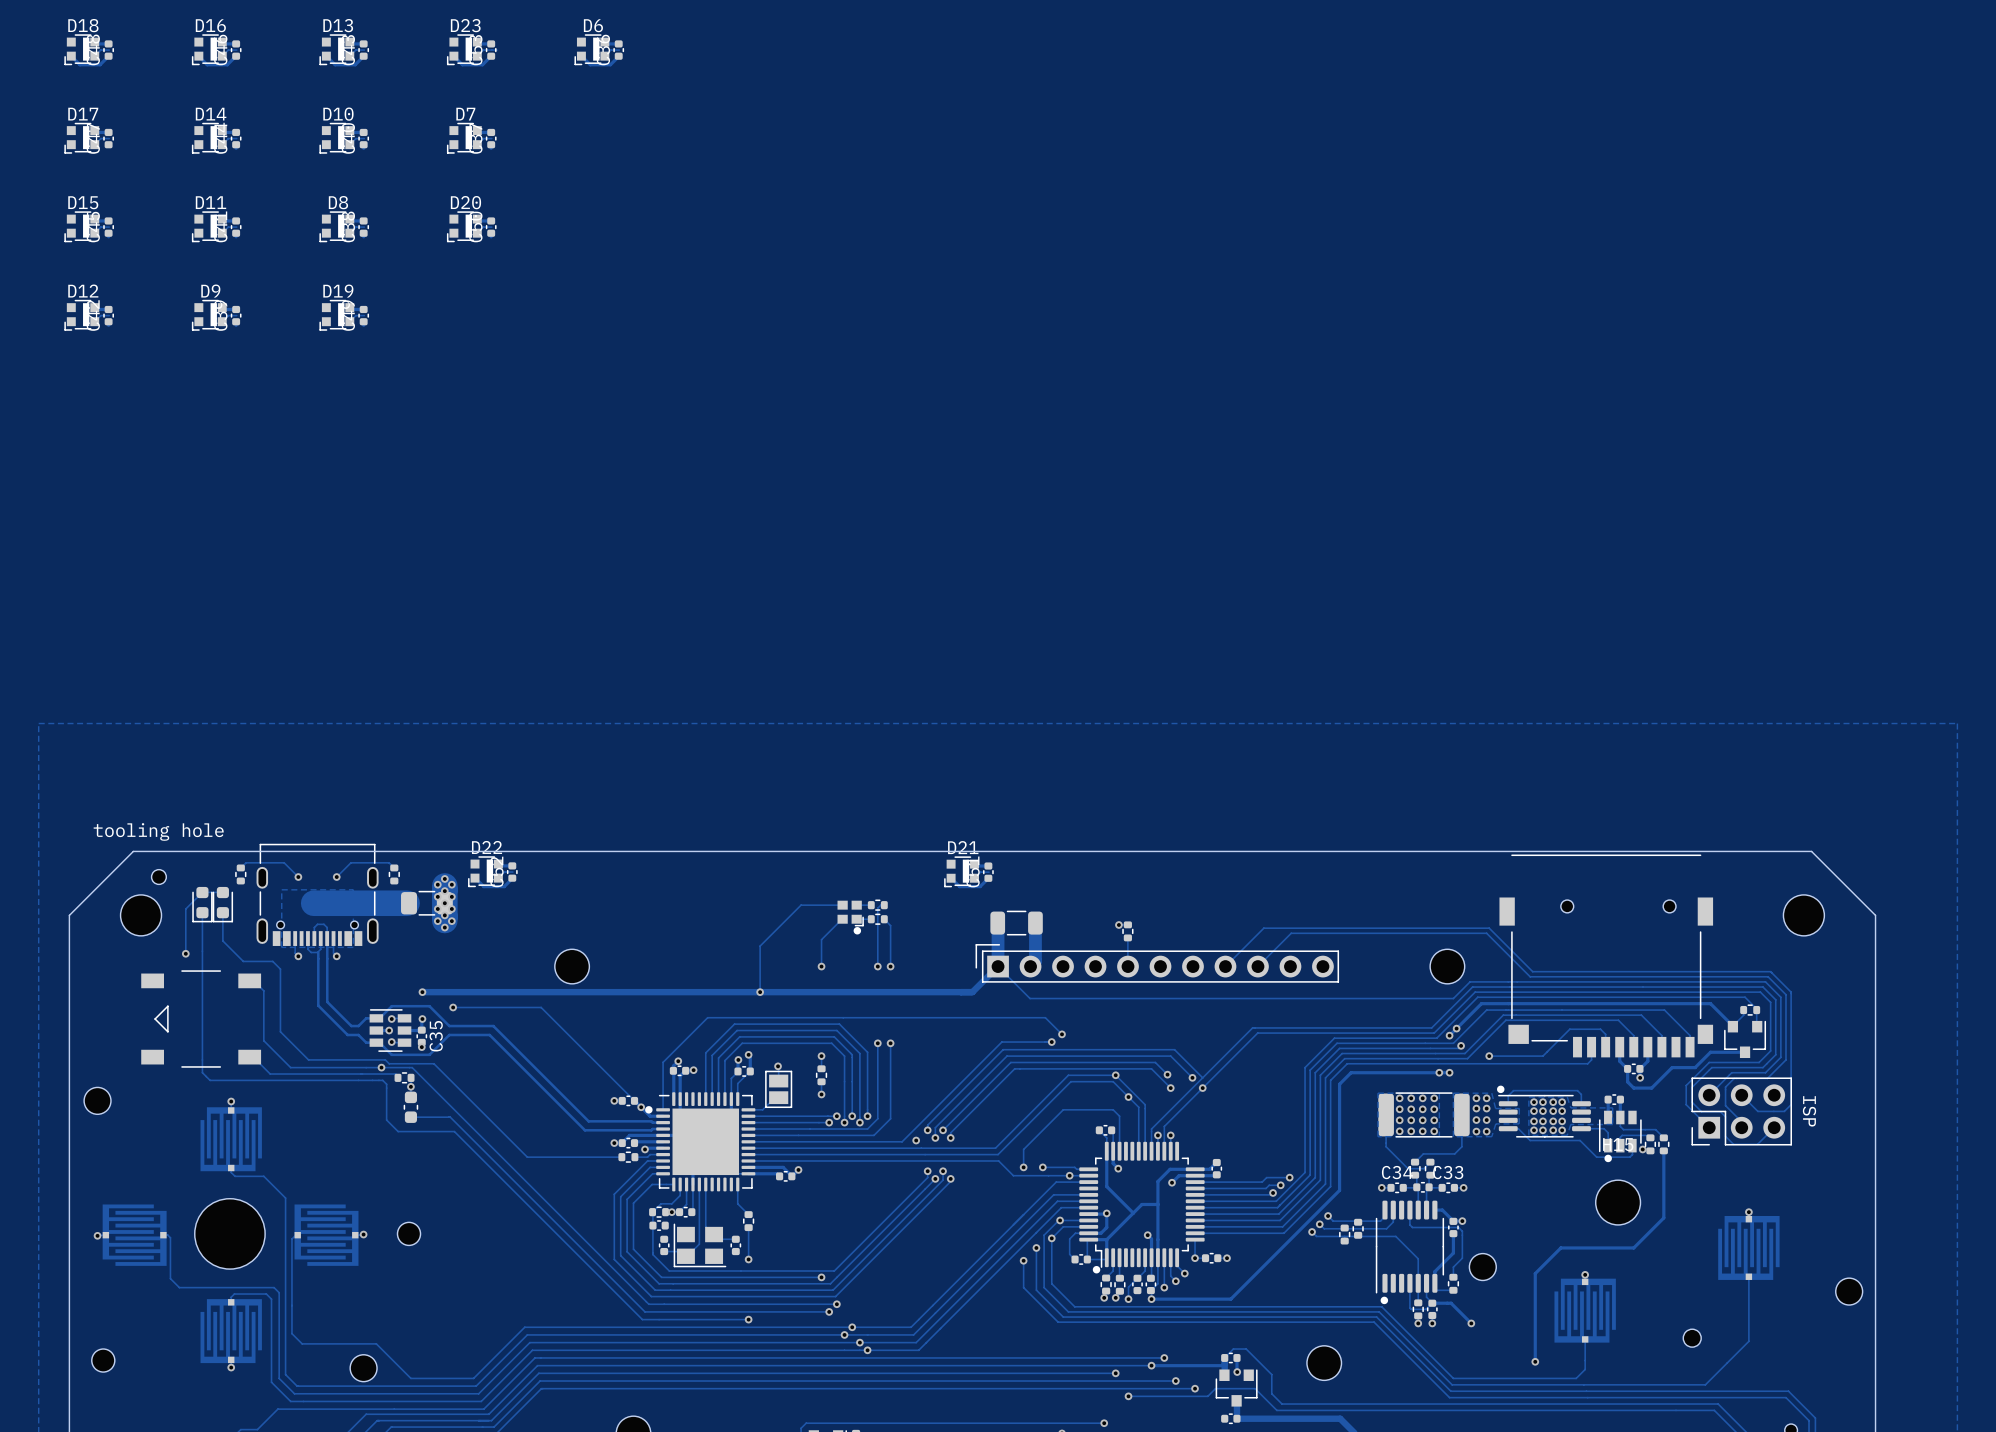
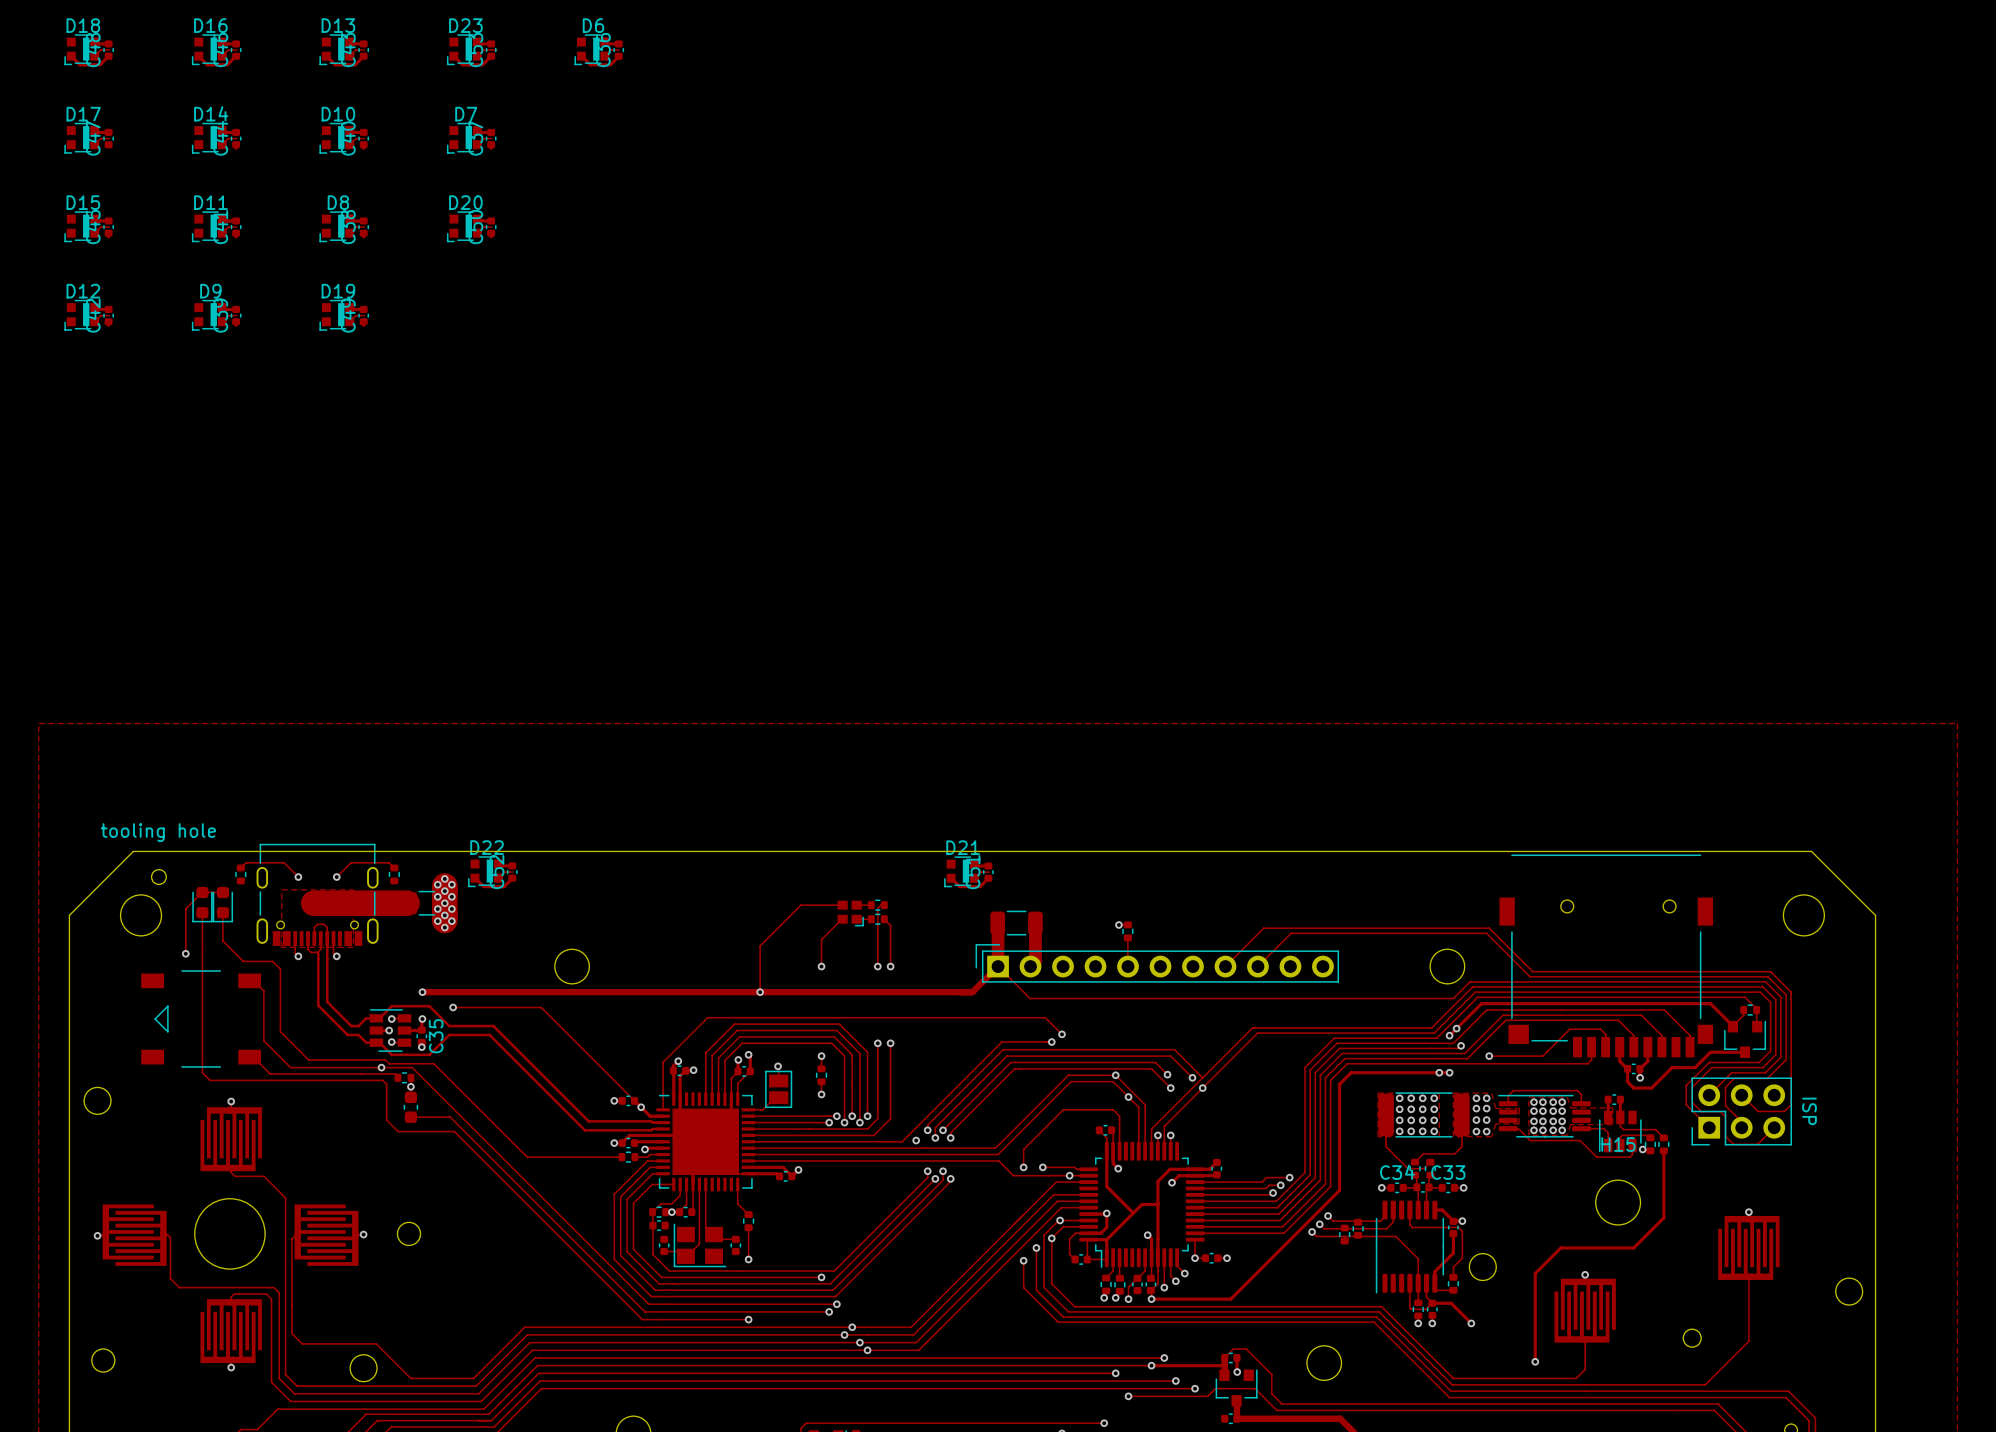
drawing: [853, 927, 862, 935] -> none
drawing: [1497, 1085, 1505, 1094] -> none
drawing: [645, 1106, 653, 1114] -> none
drawing: [1604, 1154, 1612, 1163] -> none
drawing: [1092, 1265, 1101, 1274] -> none
drawing: [1380, 1296, 1389, 1305] -> none

